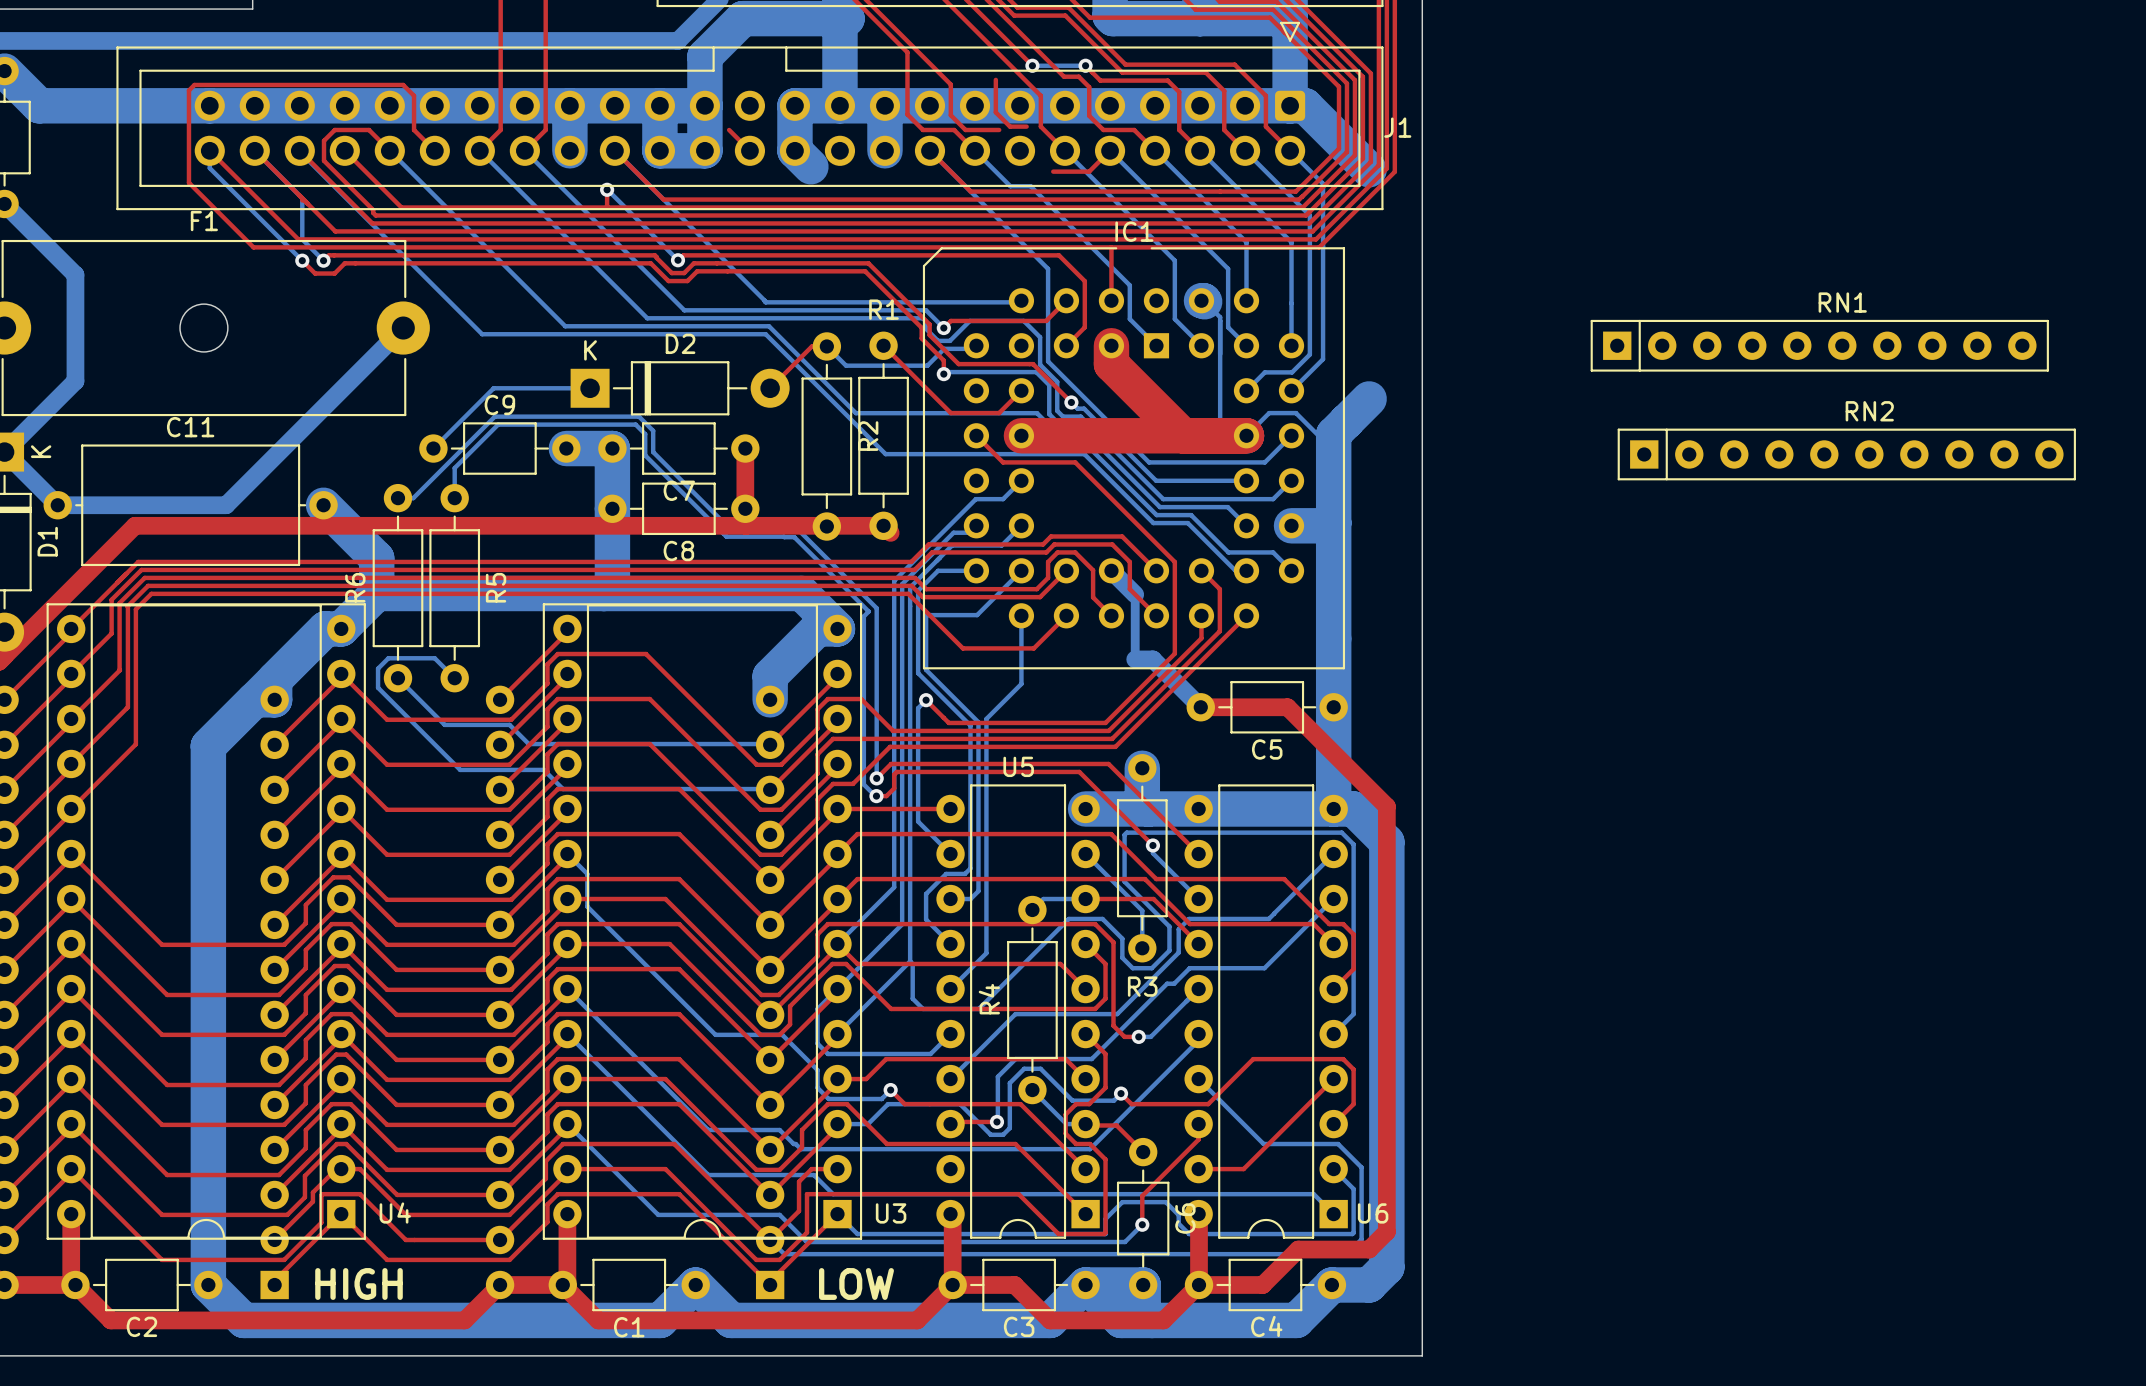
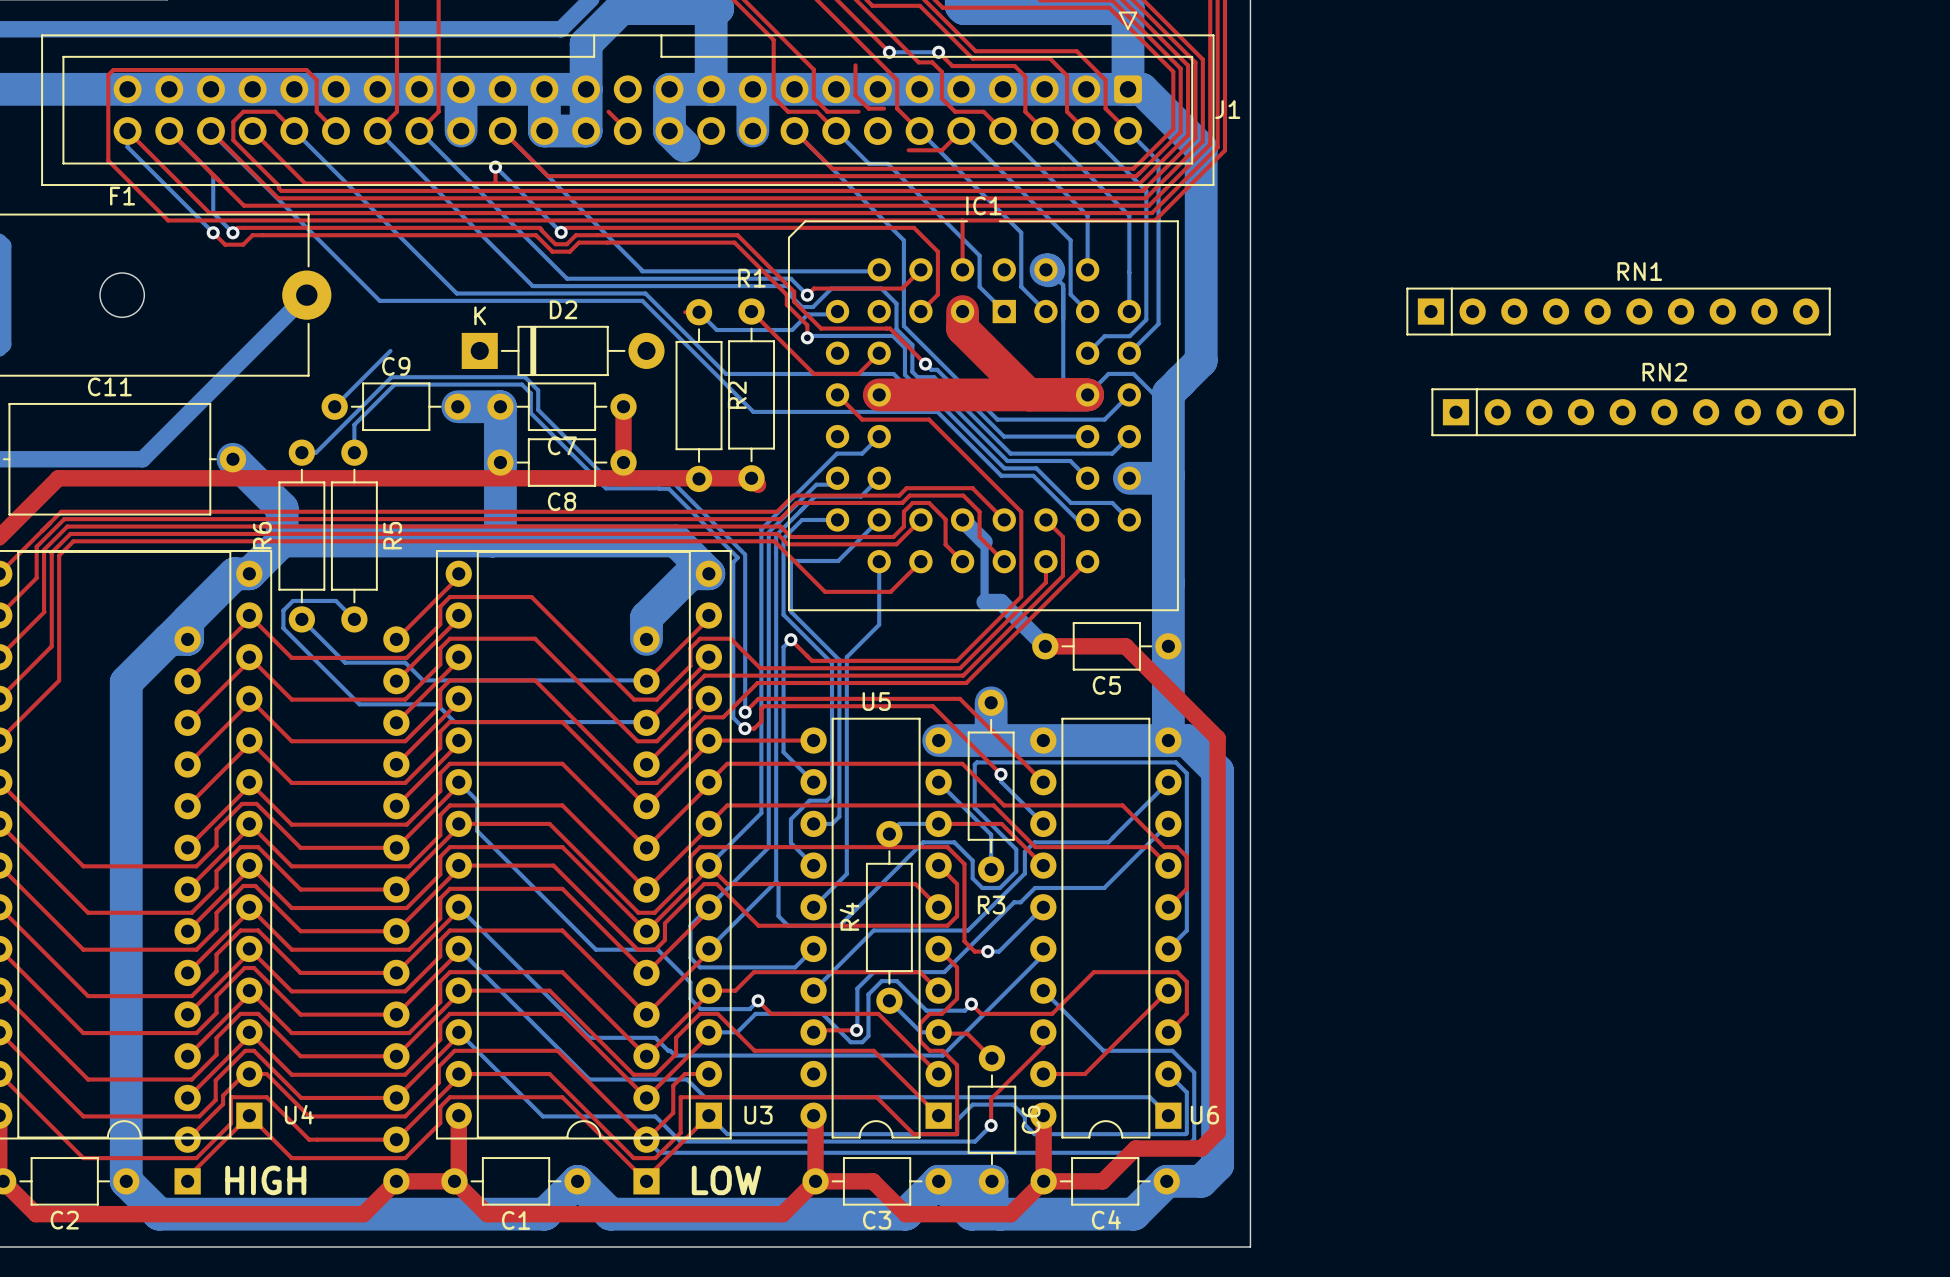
bottom track: none -> (1201, 148) (1201, 360)
top track: (811, 346) (770, 388) -> none
bottom track: (493, 388) (590, 388) -> none

